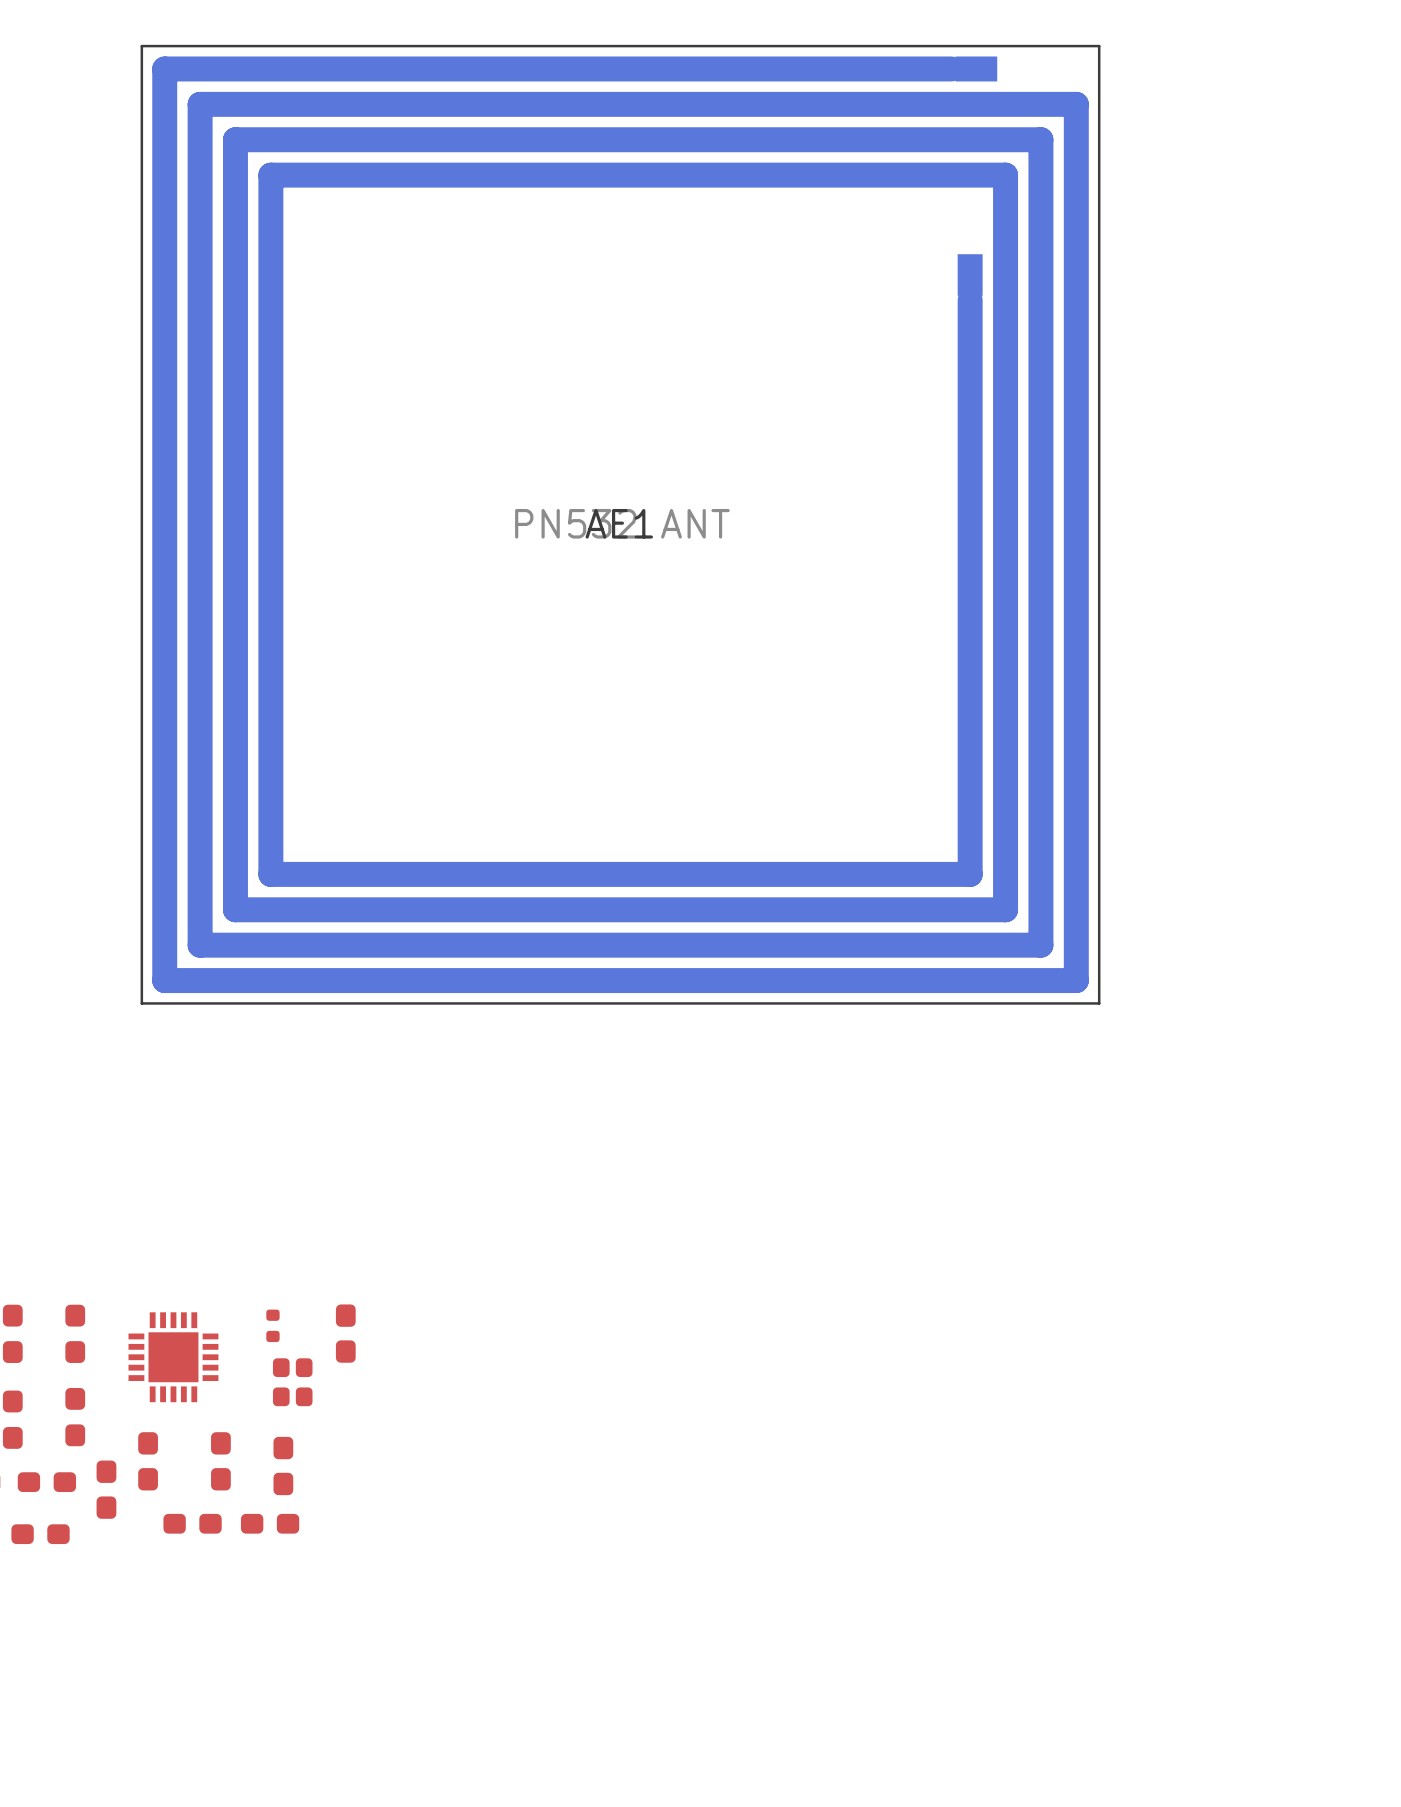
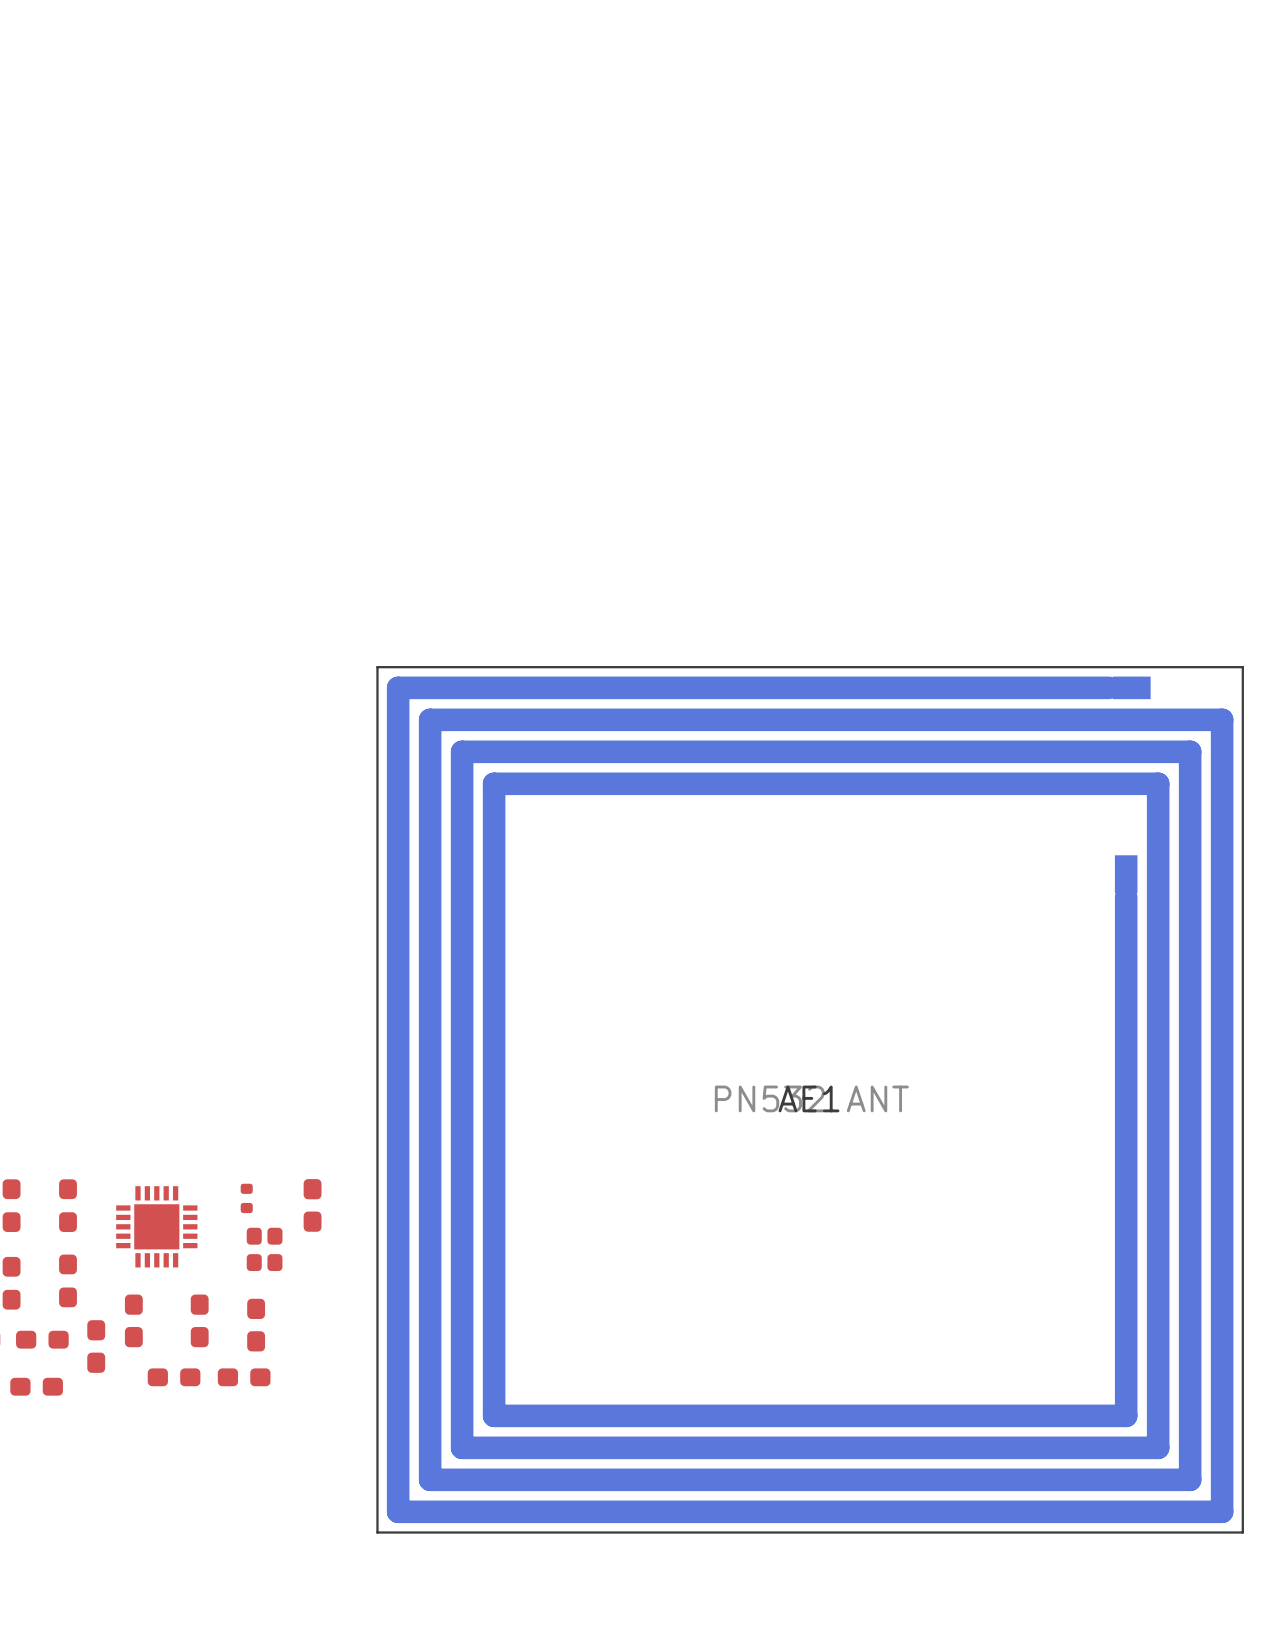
AE1 position: (620, 524) -> (810, 1099)

